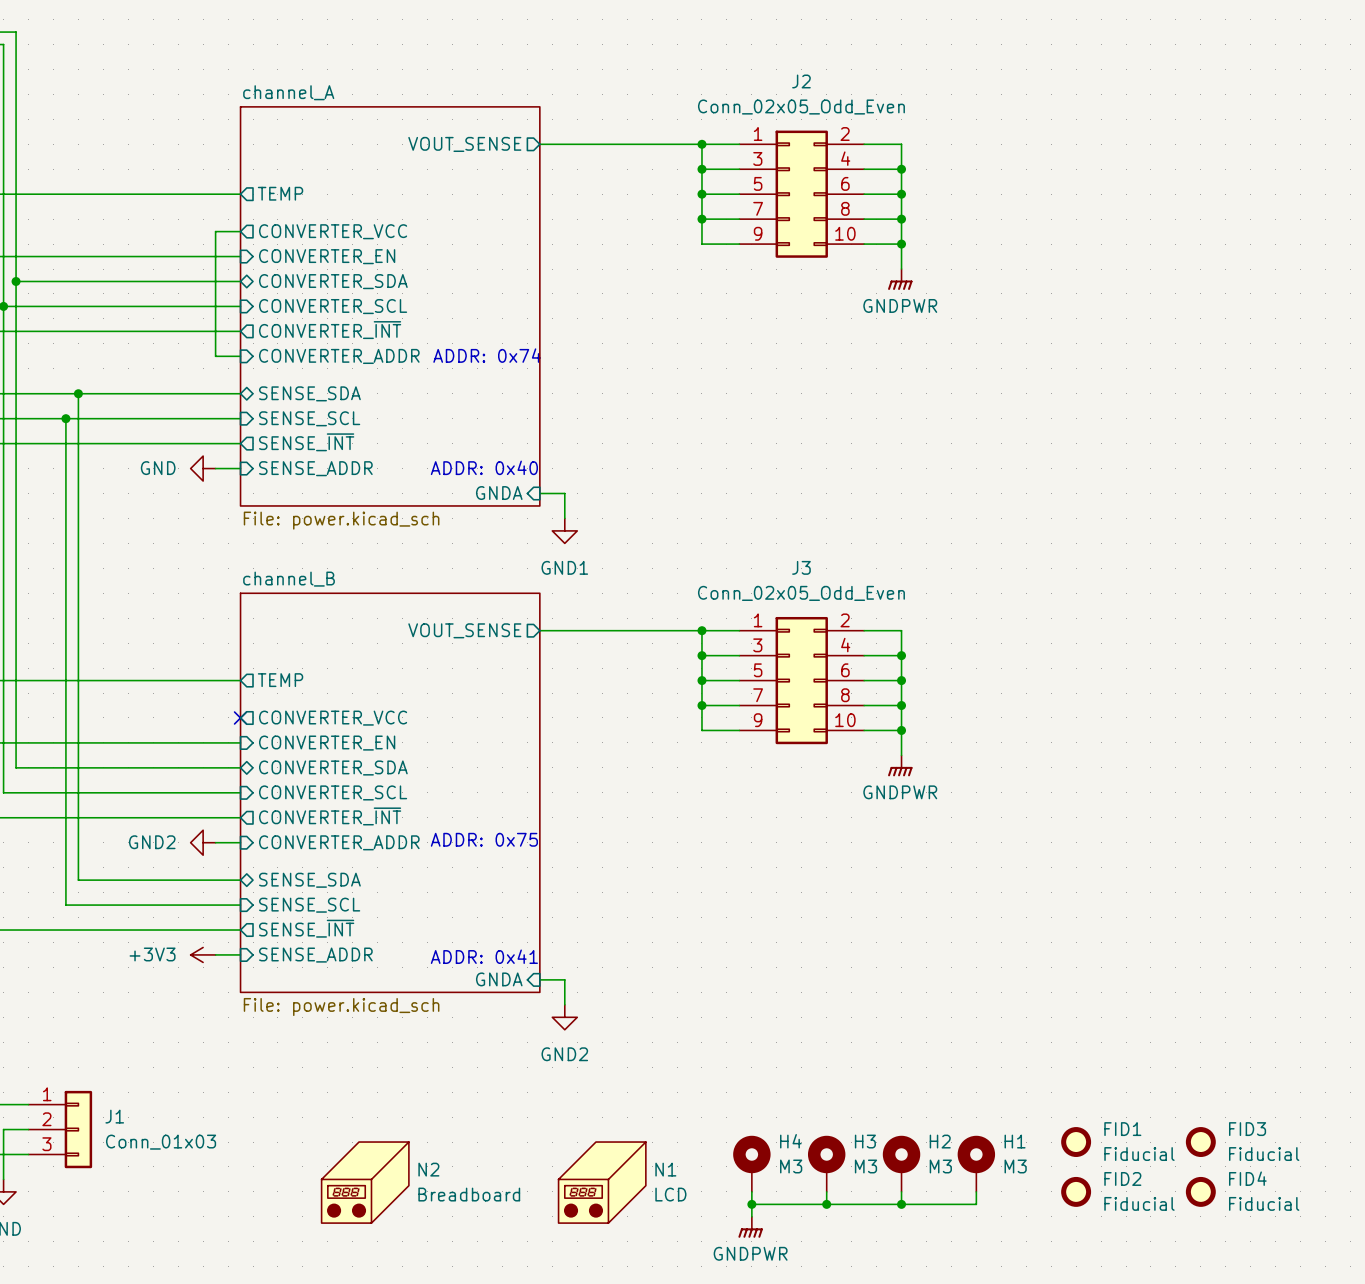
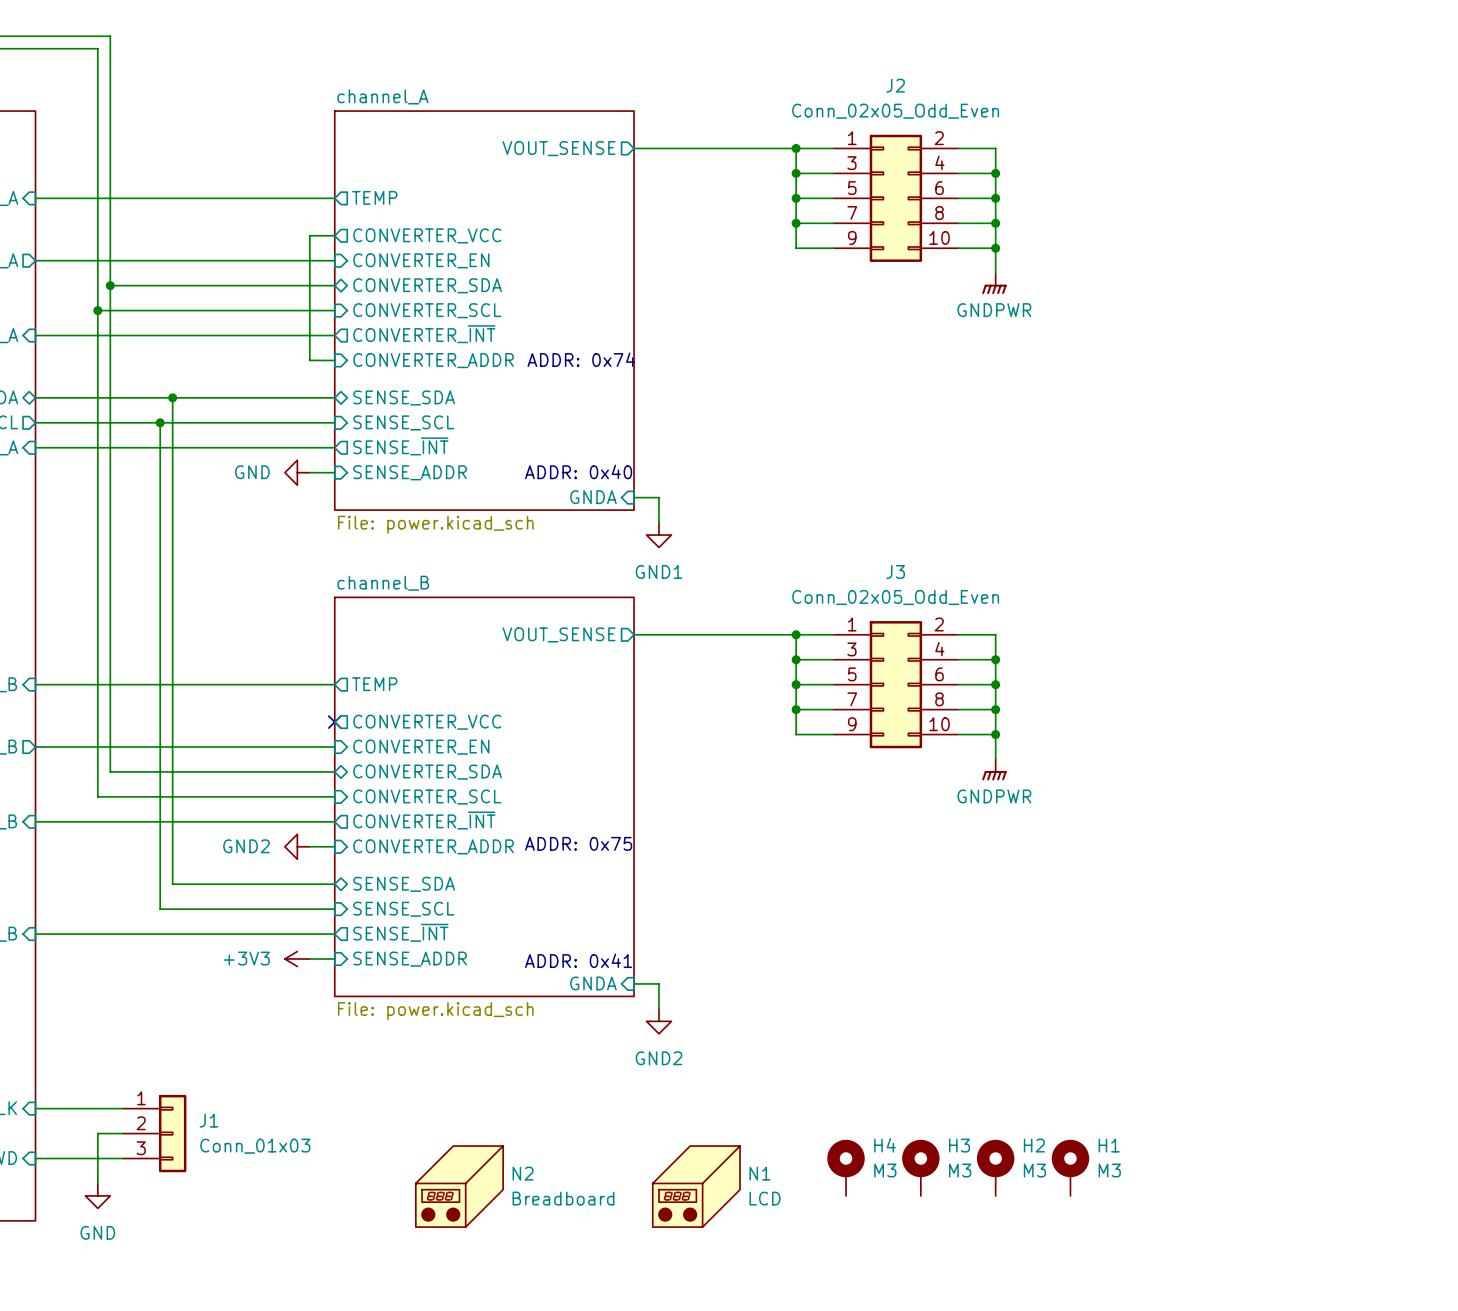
FID1: Fiducial (1076, 1142) -> none
FID3: Fiducial (1200, 1142) -> none
wire: (751, 1191) (751, 1216) -> none
wire: (826, 1191) (826, 1204) -> none
wire: (901, 1191) (901, 1204) -> none
wire: (976, 1191) (976, 1204) (751, 1204) -> none
FID2: Fiducial (1076, 1191) -> none
FID4: Fiducial (1200, 1191) -> none
junction: (751, 1204) -> none
junction: (826, 1204) -> none
junction: (901, 1204) -> none
power symbol: GNDPWR (750, 1227) -> none

